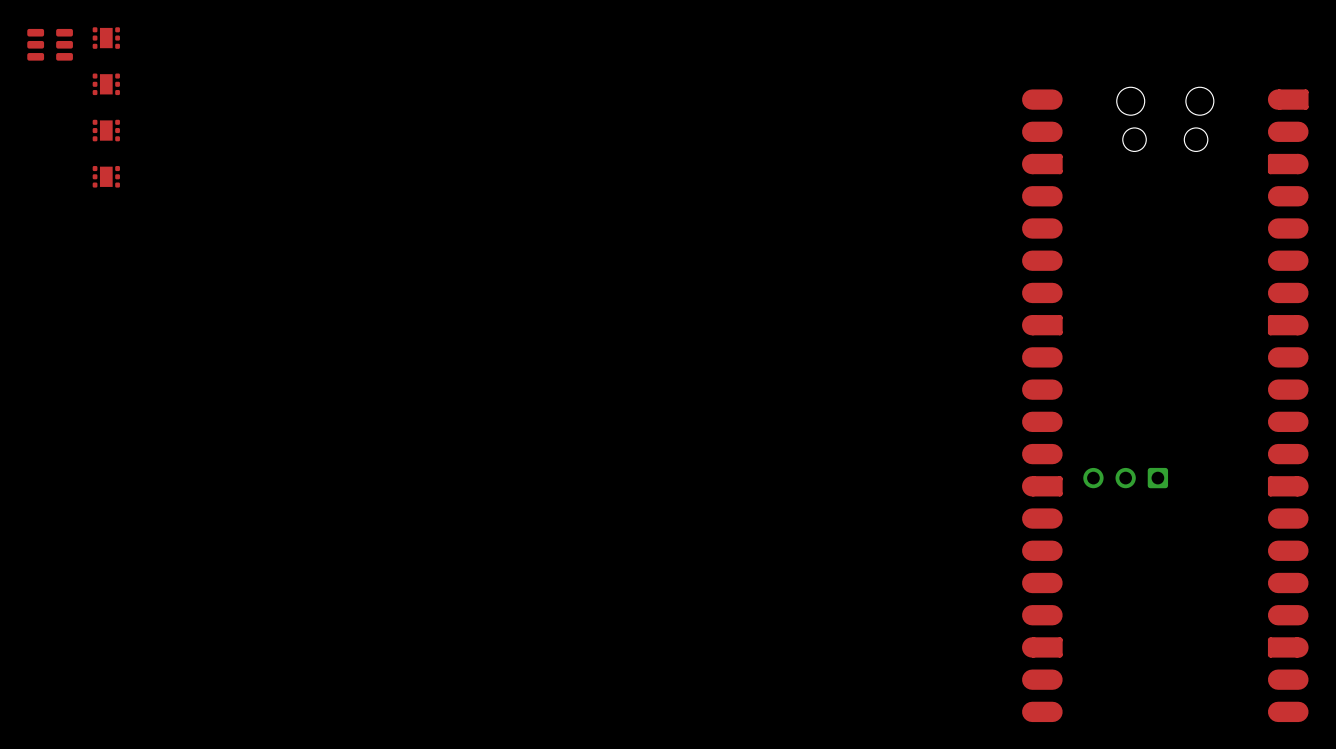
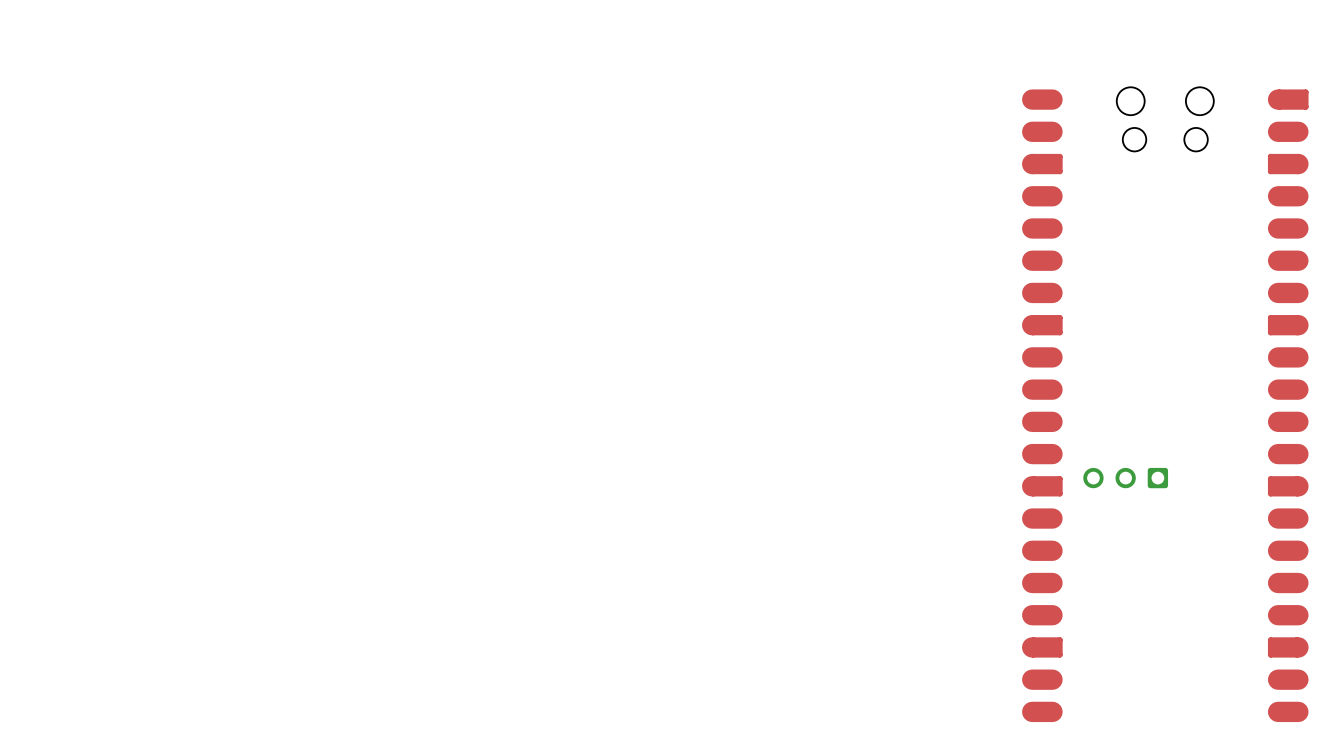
part: (106, 38) -> none
part: (50, 44) -> none
part: (106, 84) -> none
part: (106, 130) -> none
part: (106, 176) -> none

